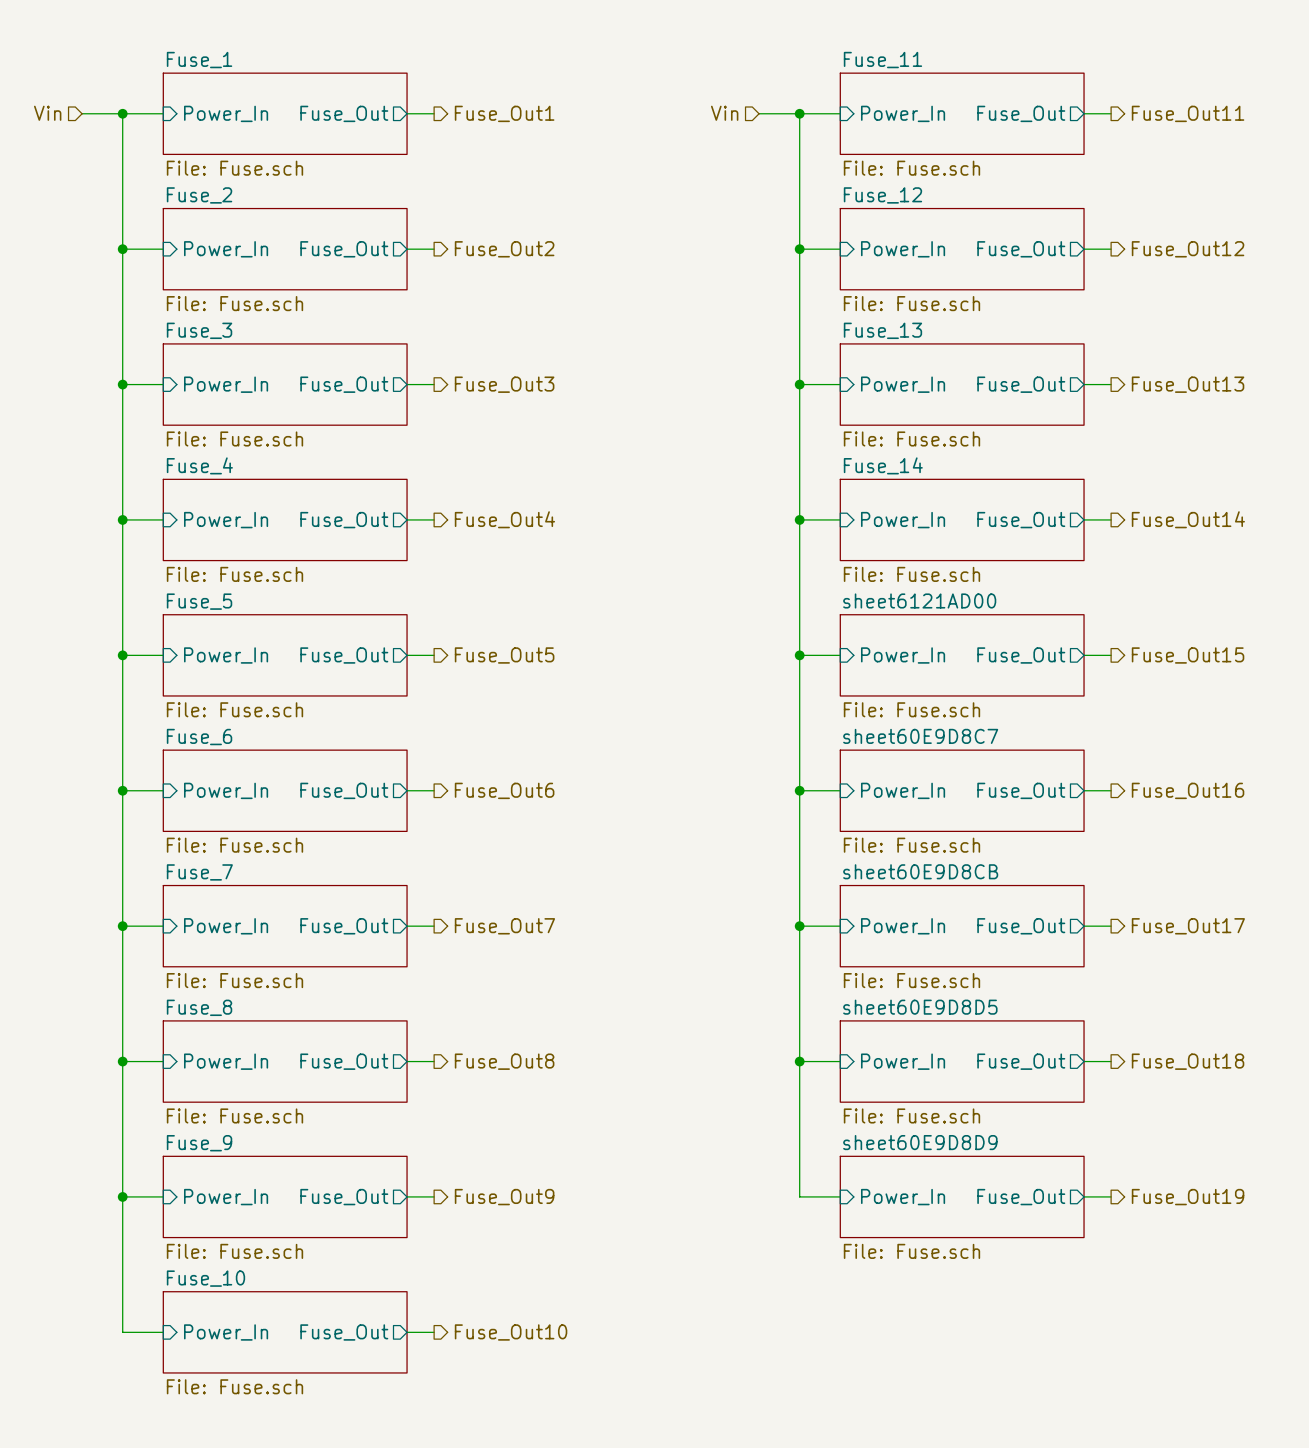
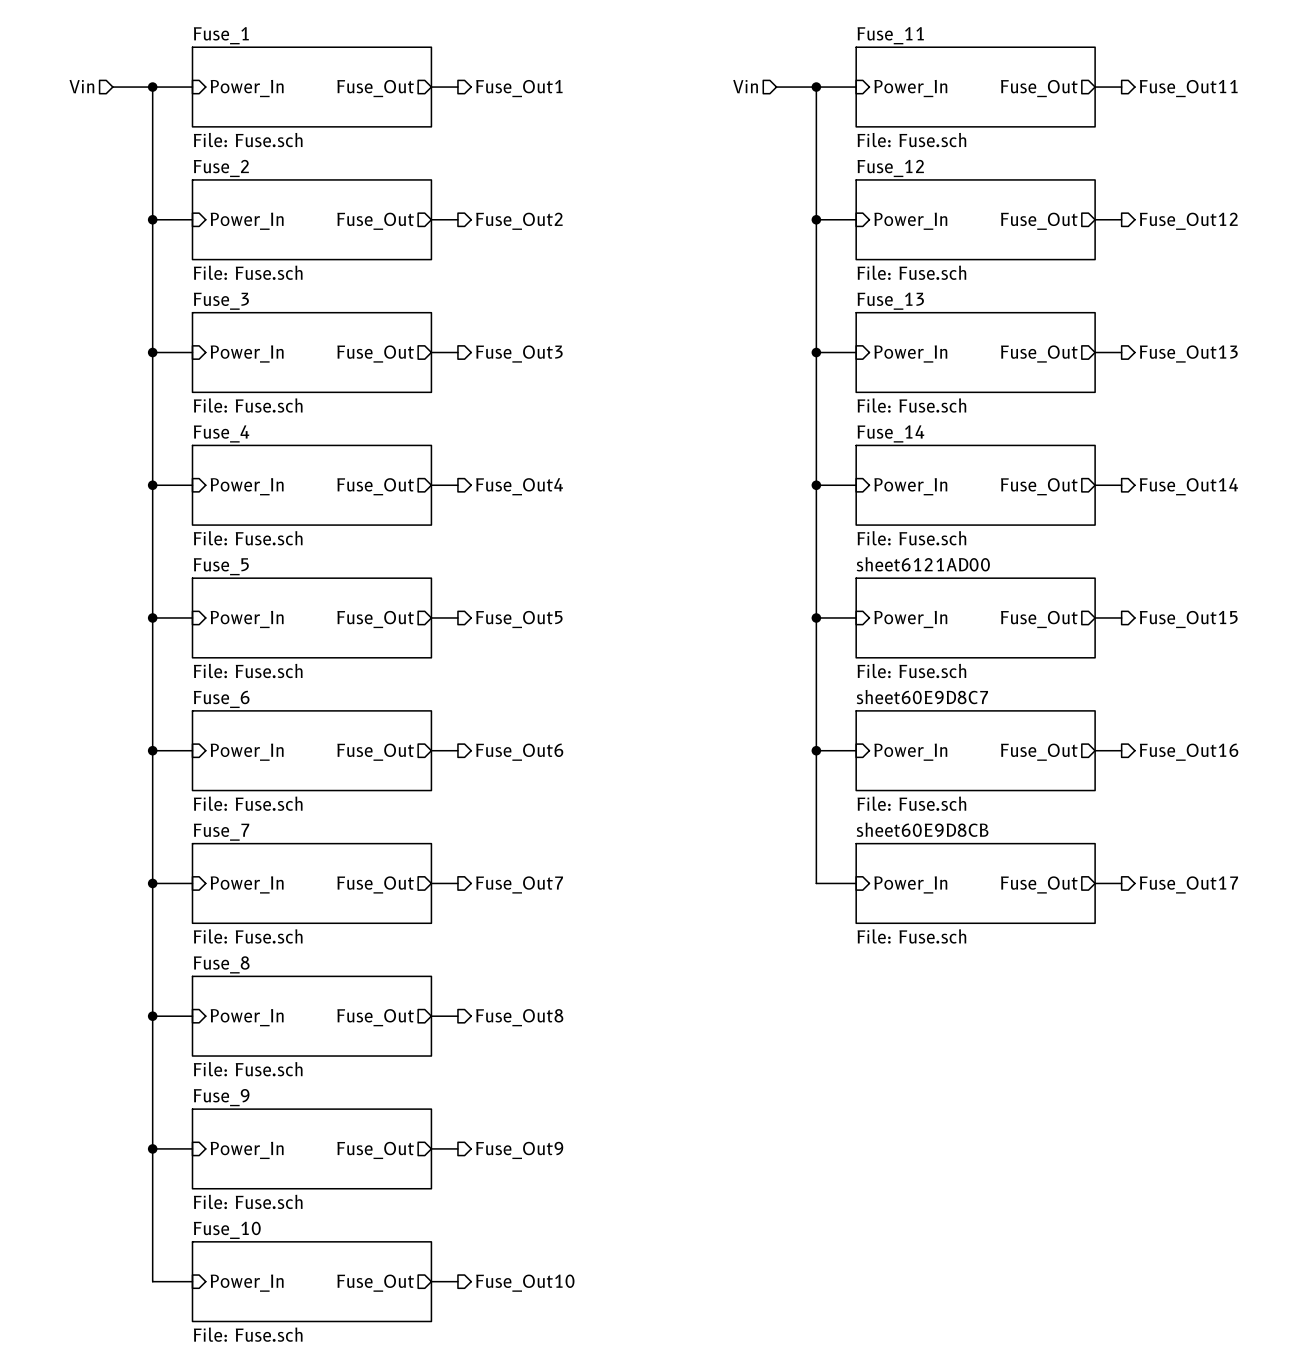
wire: (799, 926) (799, 1196) (840, 1196) -> none
junction: (799, 926) -> none
wire: (799, 1061) (840, 1061) -> none
junction: (799, 1061) -> none
sheet pin: Power_In (903, 1061) -> none
sheet sheet60E9D8D5: File: Fuse.sch (962, 1061) -> none
sheet pin: Fuse_Out (1021, 1061) -> none
wire: (1084, 1061) (1111, 1061) -> none
hierarchical label: Fuse_Out18 (1188, 1061) -> none
sheet sheet60E9D8D9: File: Fuse.sch (962, 1196) -> none
wire: (1084, 1196) (1111, 1196) -> none
sheet pin: Power_In (903, 1197) -> none
sheet pin: Fuse_Out (1021, 1197) -> none
hierarchical label: Fuse_Out19 (1188, 1197) -> none

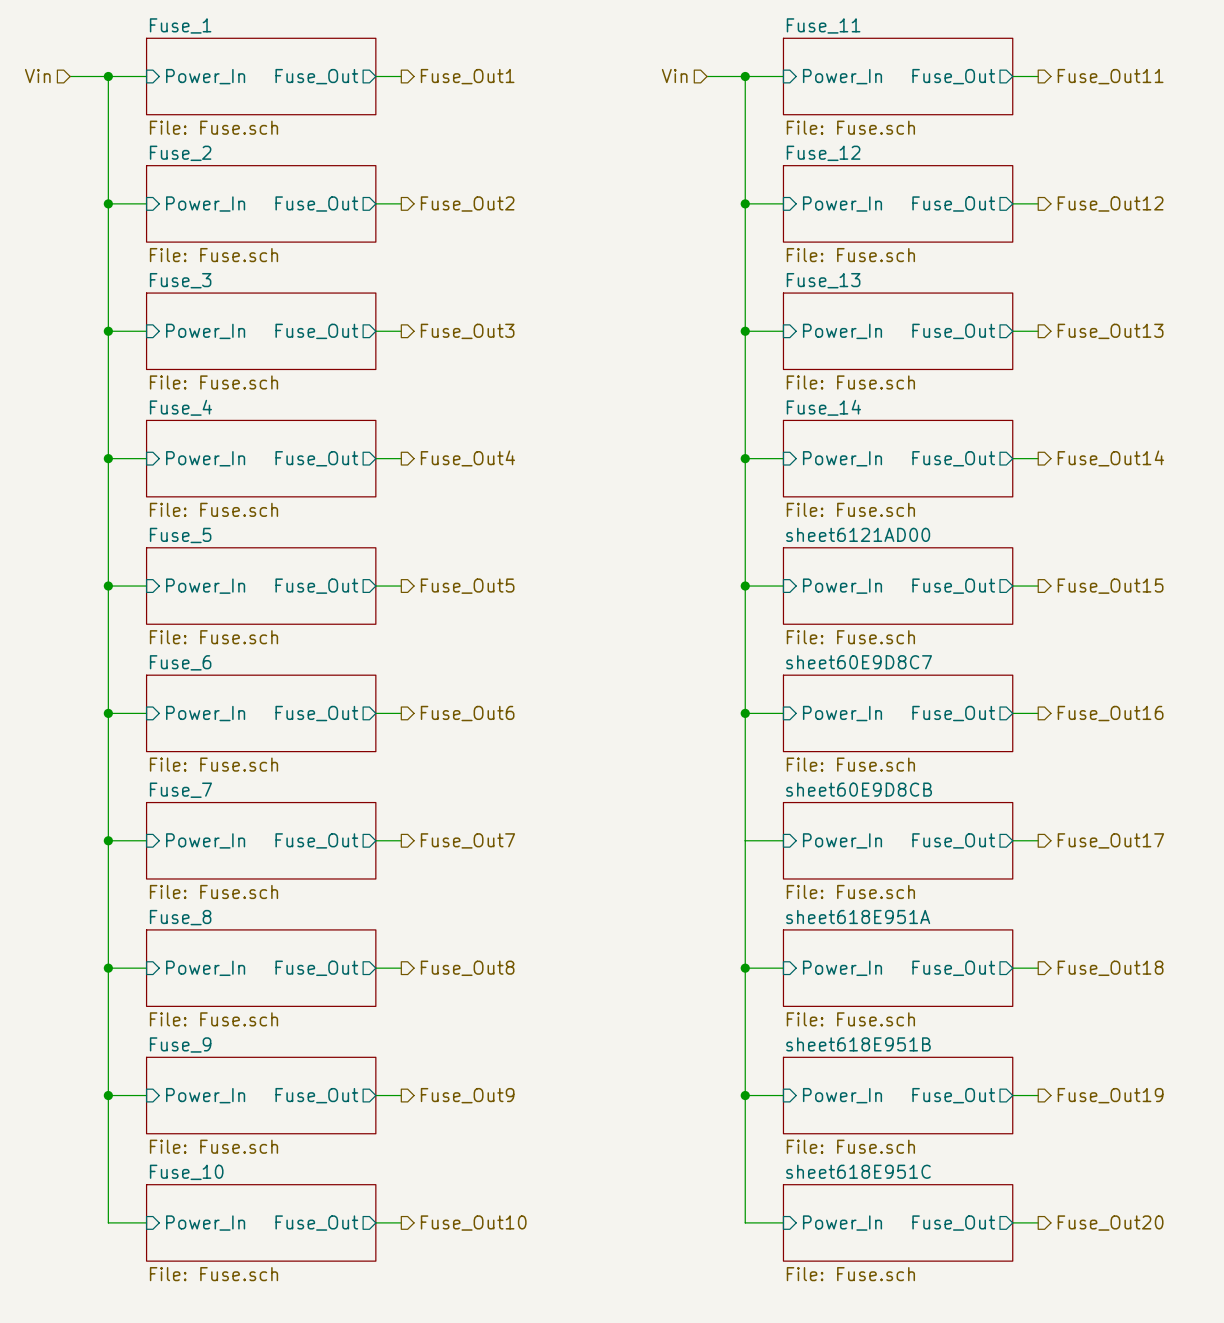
wire: none -> (745, 840) (745, 1222) (783, 1222)
wire: none -> (745, 968) (783, 968)
junction: none -> (745, 968)
sheet sheet618E951A: none -> File: Fuse.sch (898, 968)
wire: none -> (1012, 968) (1038, 968)
sheet pin: none -> Power_In (842, 968)
sheet pin: none -> Fuse_Out (953, 968)
hierarchical label: none -> Fuse_Out18 (1110, 968)
wire: none -> (745, 1095) (783, 1095)
junction: none -> (745, 1095)
sheet sheet618E951B: none -> File: Fuse.sch (898, 1095)
wire: none -> (1012, 1095) (1038, 1095)
sheet pin: none -> Power_In (842, 1095)
sheet pin: none -> Fuse_Out (953, 1095)
hierarchical label: none -> Fuse_Out19 (1110, 1095)
sheet sheet618E951C: none -> File: Fuse.sch (898, 1222)
wire: none -> (1012, 1222) (1038, 1222)
sheet pin: none -> Power_In (842, 1223)
sheet pin: none -> Fuse_Out (953, 1223)
hierarchical label: none -> Fuse_Out20 (1110, 1223)

